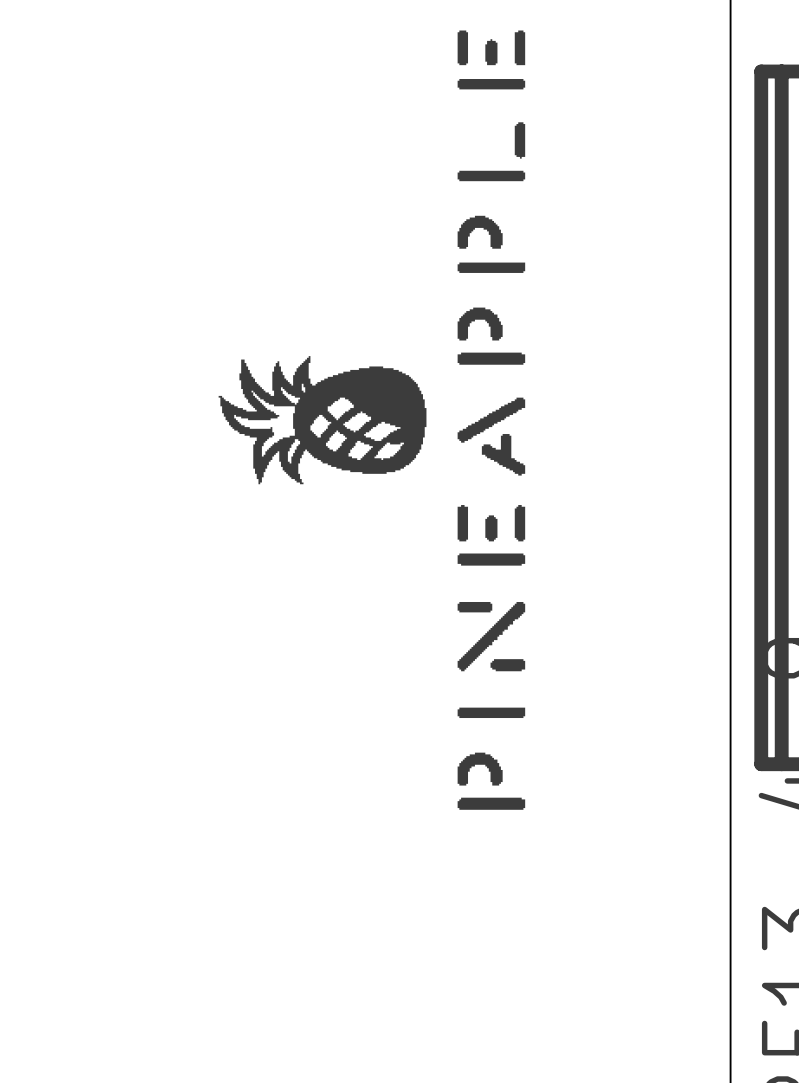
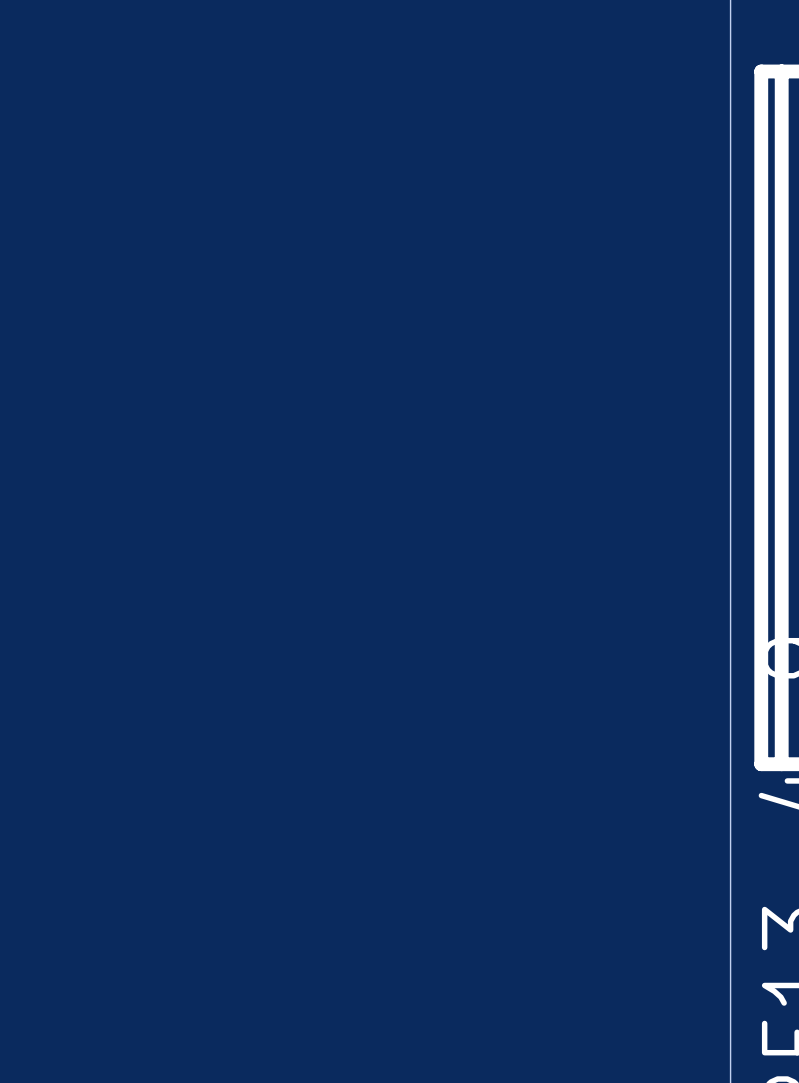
drawing: [218, 30, 526, 810] -> none

